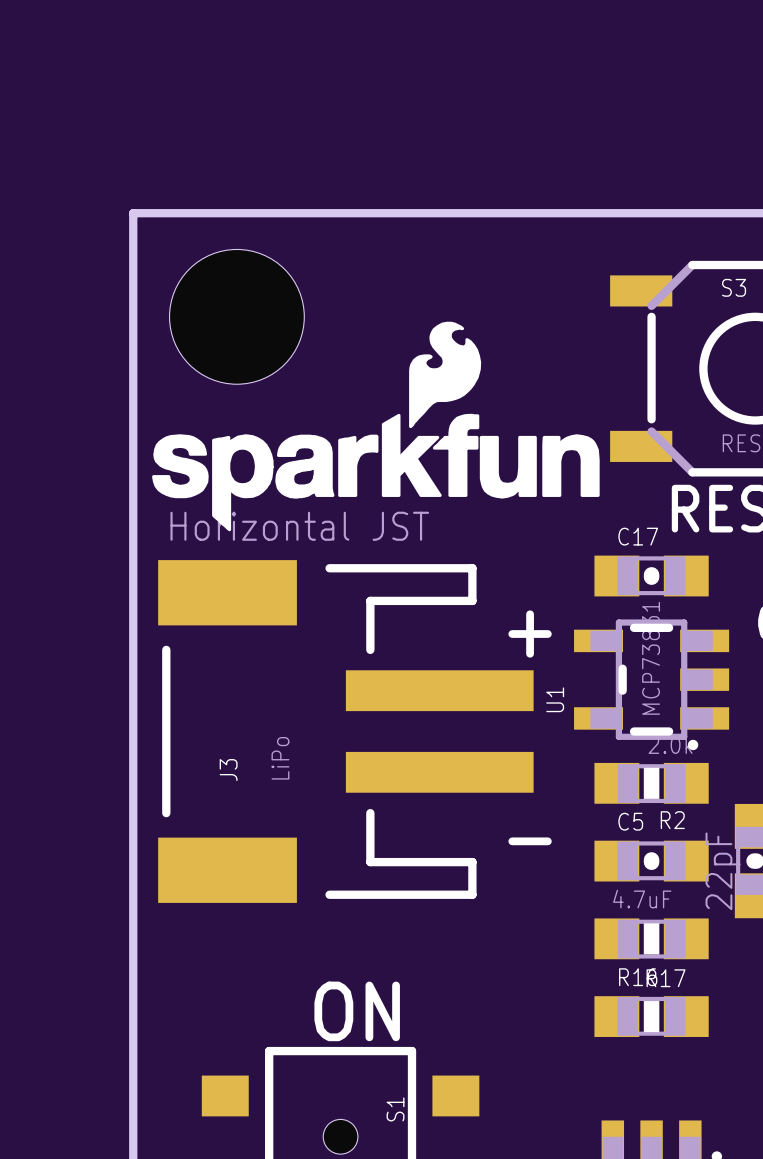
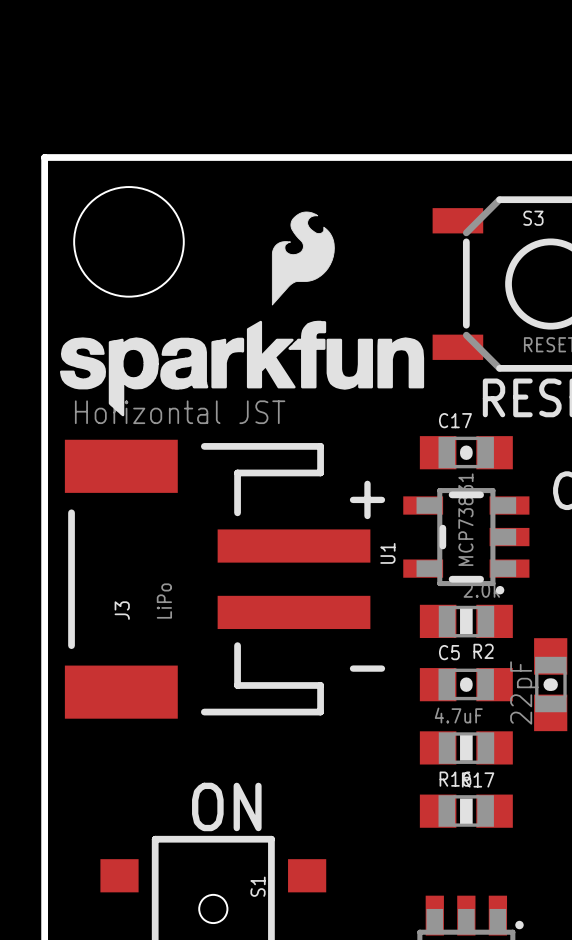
drawing shape: [409, 321, 482, 429] -> [271, 211, 335, 306]

